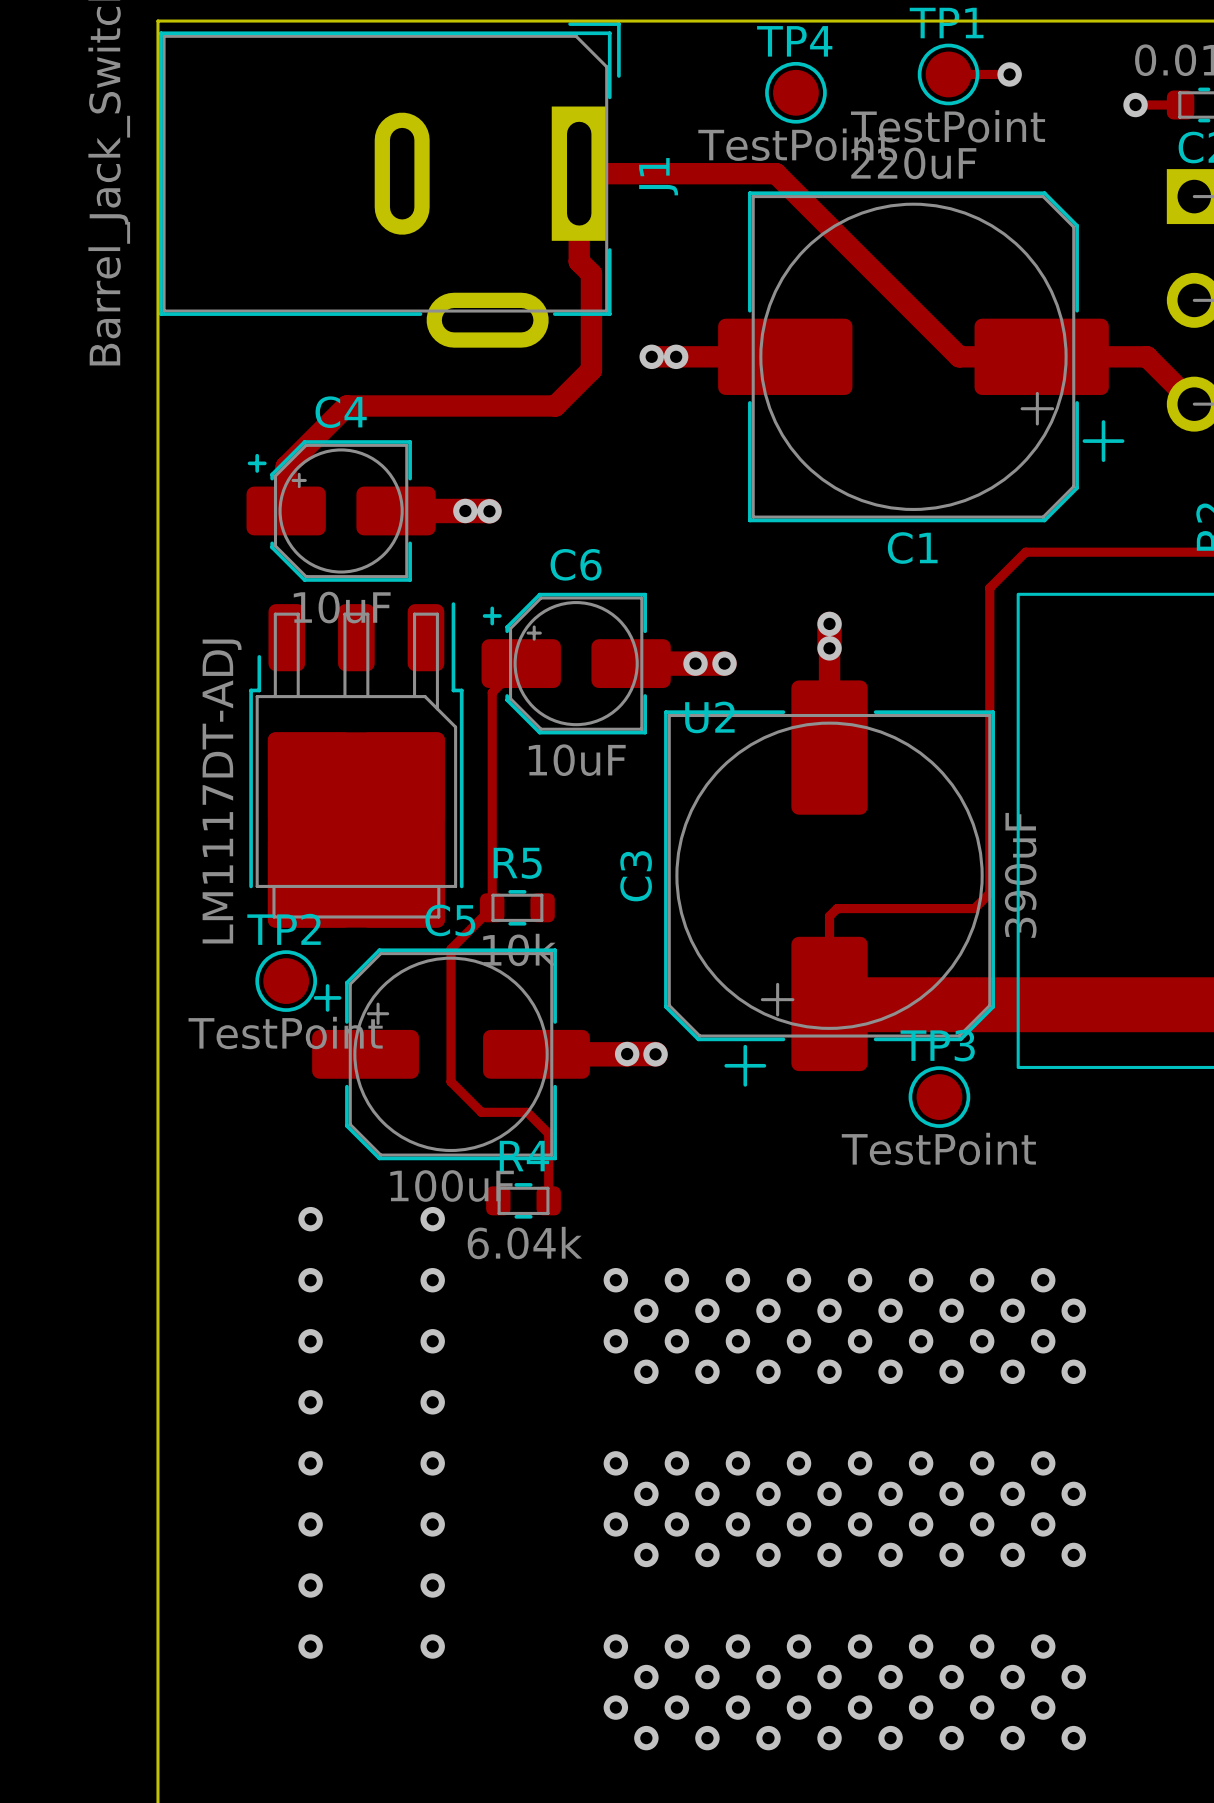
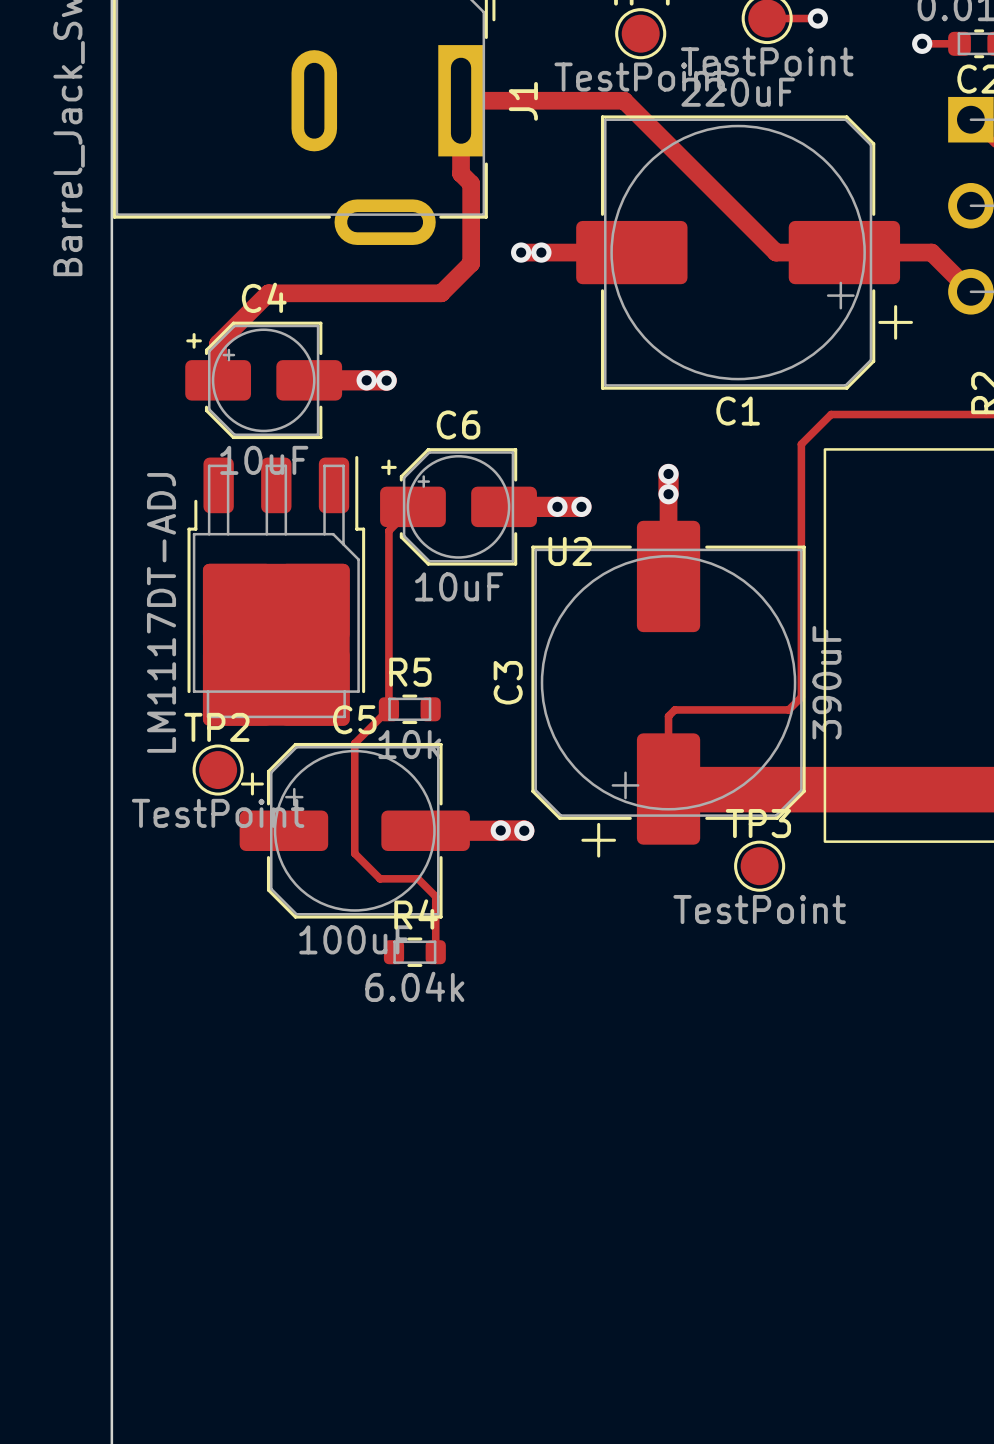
via: (310, 1219) -> none
via: (432, 1219) -> none
via: (310, 1280) -> none
via: (432, 1280) -> none
via: (615, 1280) -> none
via: (676, 1280) -> none
via: (737, 1280) -> none
via: (799, 1280) -> none
via: (860, 1280) -> none
via: (921, 1280) -> none
via: (982, 1280) -> none
via: (1043, 1280) -> none
via: (646, 1310) -> none
via: (707, 1310) -> none
via: (768, 1310) -> none
via: (829, 1310) -> none
via: (890, 1310) -> none
via: (951, 1310) -> none
via: (1012, 1310) -> none
via: (1073, 1310) -> none
via: (310, 1341) -> none
via: (432, 1341) -> none
via: (615, 1341) -> none
via: (676, 1341) -> none
via: (737, 1341) -> none
via: (799, 1341) -> none
via: (860, 1341) -> none
via: (921, 1341) -> none
via: (982, 1341) -> none
via: (1043, 1341) -> none
via: (646, 1371) -> none
via: (707, 1371) -> none
via: (768, 1371) -> none
via: (829, 1371) -> none
via: (890, 1371) -> none
via: (951, 1371) -> none
via: (1012, 1371) -> none
via: (1073, 1371) -> none
via: (310, 1402) -> none
via: (432, 1402) -> none
via: (310, 1463) -> none
via: (432, 1463) -> none
via: (615, 1463) -> none
via: (676, 1463) -> none
via: (737, 1463) -> none
via: (799, 1463) -> none
via: (860, 1463) -> none
via: (921, 1463) -> none
via: (982, 1463) -> none
via: (1043, 1463) -> none
via: (646, 1493) -> none
via: (707, 1493) -> none
via: (768, 1493) -> none
via: (829, 1493) -> none
via: (890, 1493) -> none
via: (951, 1493) -> none
via: (1012, 1493) -> none
via: (1073, 1493) -> none
via: (310, 1524) -> none
via: (432, 1524) -> none
via: (615, 1524) -> none
via: (676, 1524) -> none
via: (737, 1524) -> none
via: (799, 1524) -> none
via: (860, 1524) -> none
via: (921, 1524) -> none
via: (982, 1524) -> none
via: (1043, 1524) -> none
via: (646, 1554) -> none
via: (707, 1554) -> none
via: (768, 1554) -> none
via: (829, 1554) -> none
via: (890, 1554) -> none
via: (951, 1554) -> none
via: (1012, 1554) -> none
via: (1073, 1554) -> none
via: (310, 1585) -> none
via: (432, 1585) -> none
via: (310, 1646) -> none
via: (432, 1646) -> none
via: (615, 1646) -> none
via: (676, 1646) -> none
via: (737, 1646) -> none
via: (799, 1646) -> none
via: (860, 1646) -> none
via: (921, 1646) -> none
via: (982, 1646) -> none
via: (1043, 1646) -> none
via: (646, 1677) -> none
via: (707, 1677) -> none
via: (768, 1677) -> none
via: (829, 1677) -> none
via: (890, 1677) -> none
via: (951, 1677) -> none
via: (1012, 1677) -> none
via: (1073, 1677) -> none
via: (615, 1707) -> none
via: (676, 1707) -> none
via: (737, 1707) -> none
via: (799, 1707) -> none
via: (860, 1707) -> none
via: (921, 1707) -> none
via: (982, 1707) -> none
via: (1043, 1707) -> none
via: (646, 1738) -> none
via: (707, 1738) -> none
via: (768, 1738) -> none
via: (829, 1738) -> none
via: (890, 1738) -> none
via: (951, 1738) -> none
via: (1012, 1738) -> none
via: (1073, 1738) -> none

